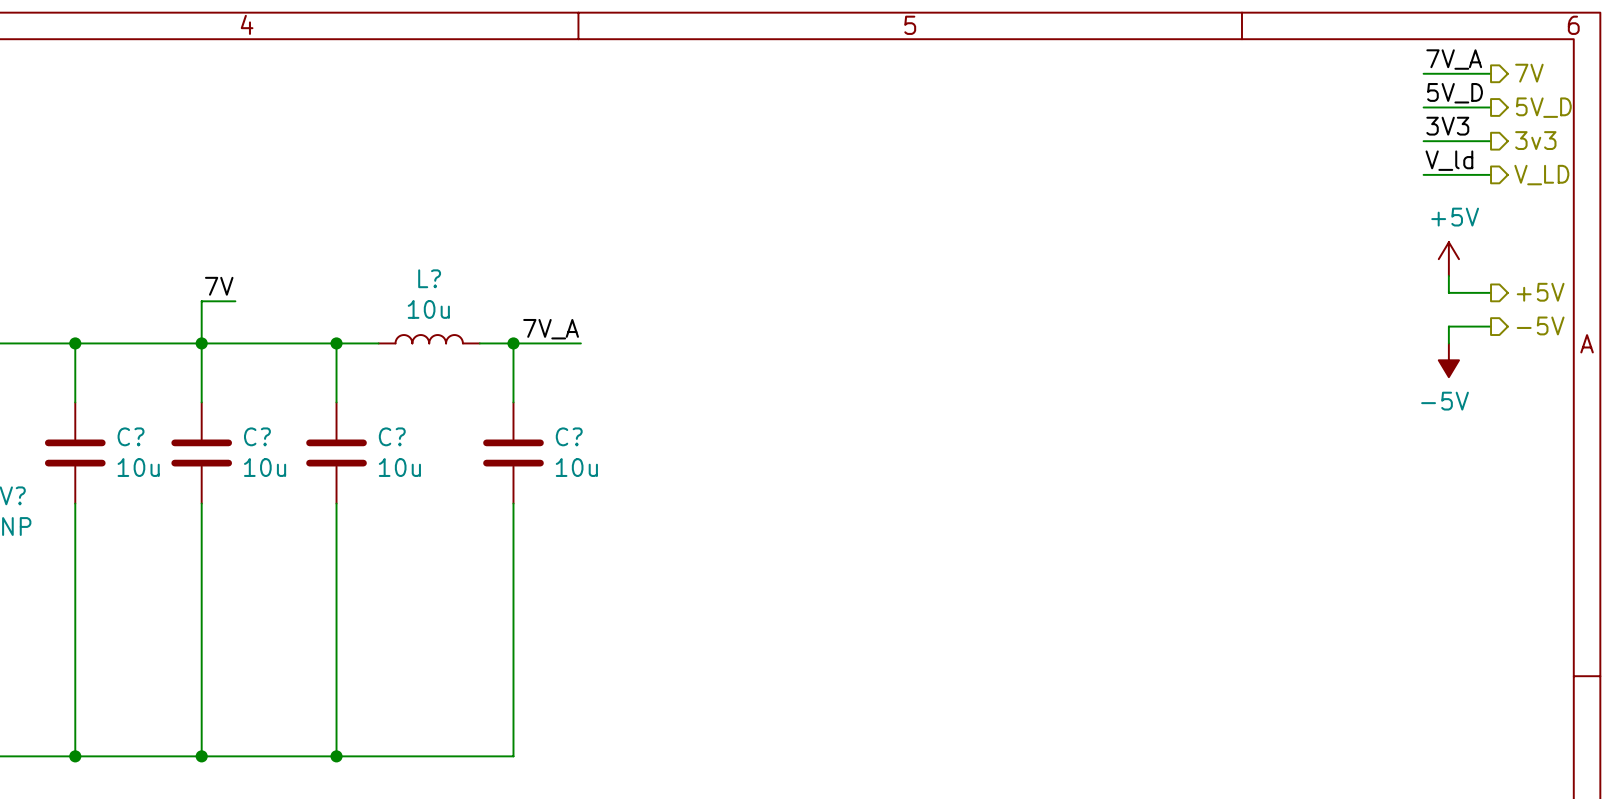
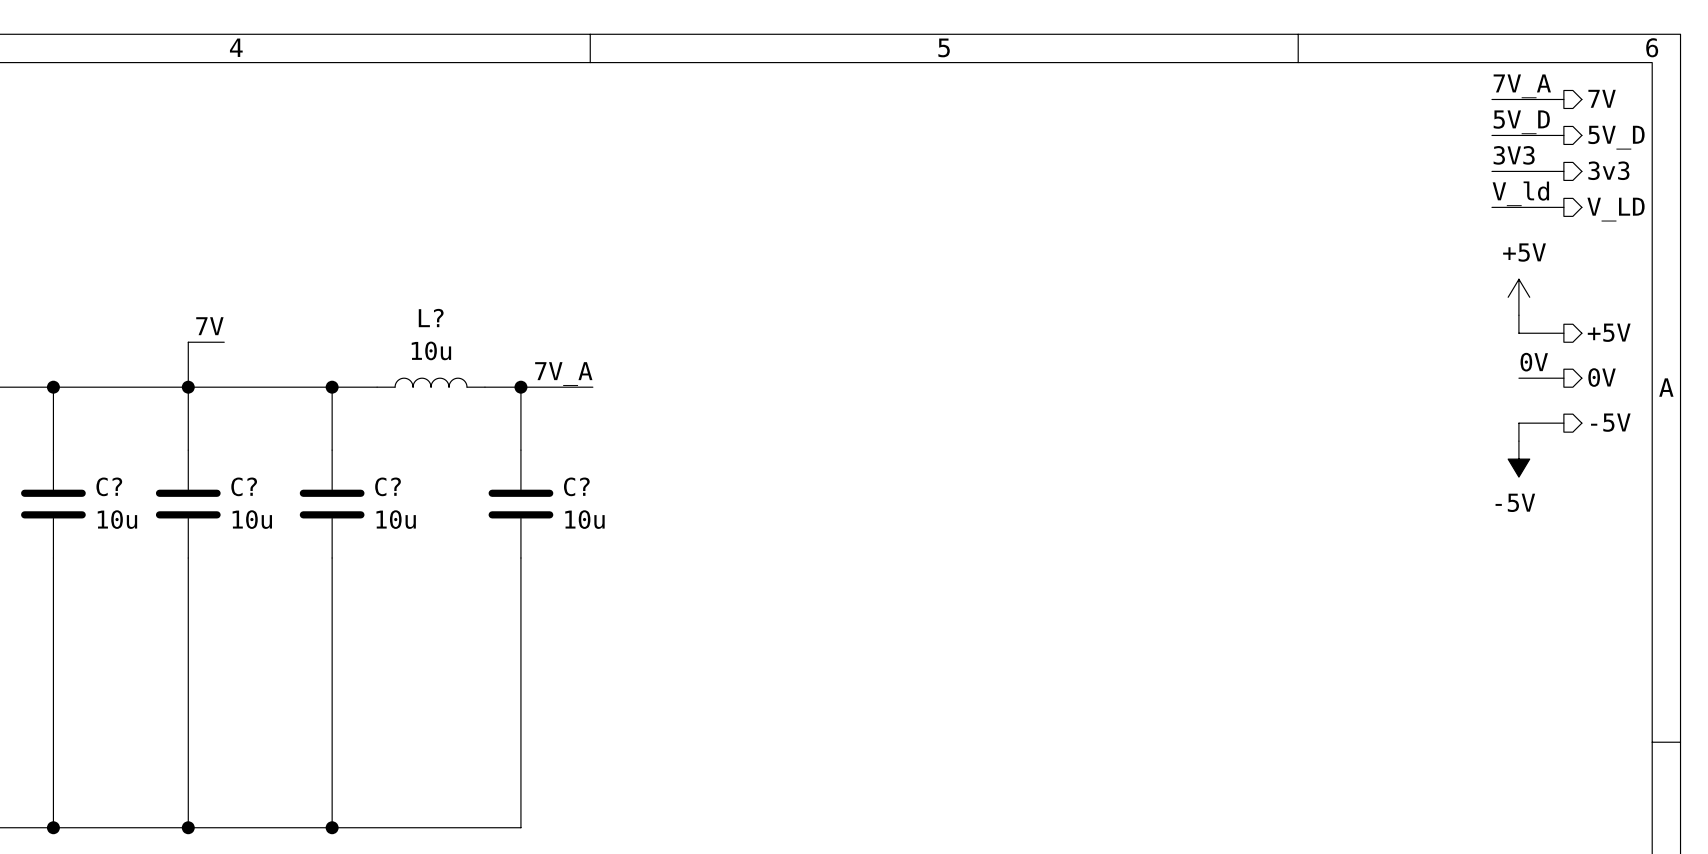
label: none -> 0V (1534, 362)
hierarchical label: -5V (1540, 325) -> 0V (1602, 377)
wire: (1491, 326) (1448, 326) (1448, 343) -> (1563, 423) (1518, 423) (1518, 441)
wire: none -> (1518, 378) (1563, 378)
power symbol position: -5V (1448, 360) -> -5V (1518, 459)
hierarchical label: none -> -5V (1610, 422)

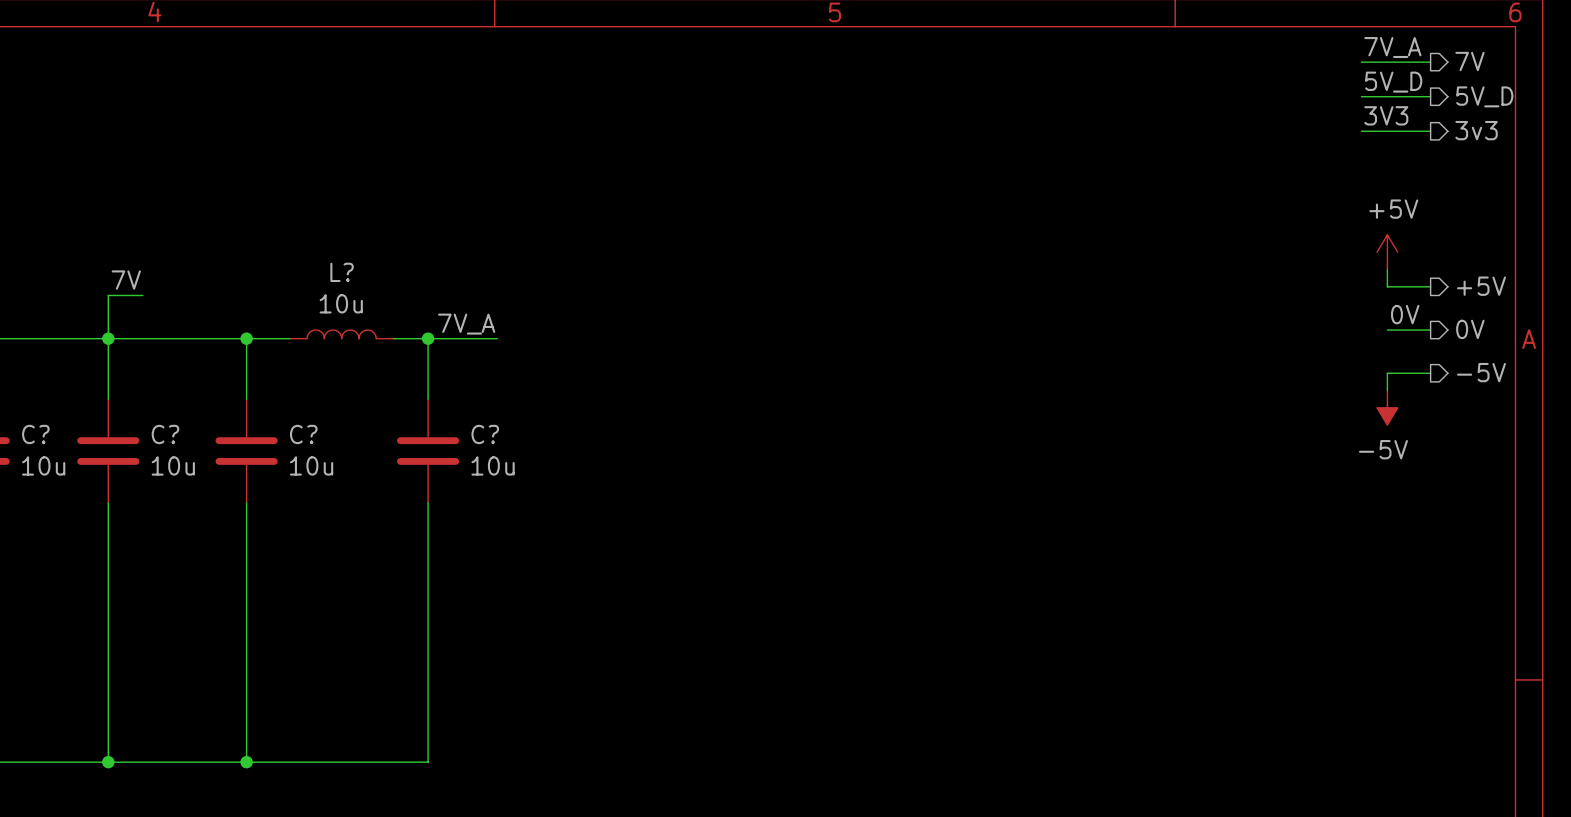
label: V_ld (1520, 193) -> none
wire: (1491, 207) (1563, 207) -> none
hierarchical label: V_LD (1616, 209) -> none

